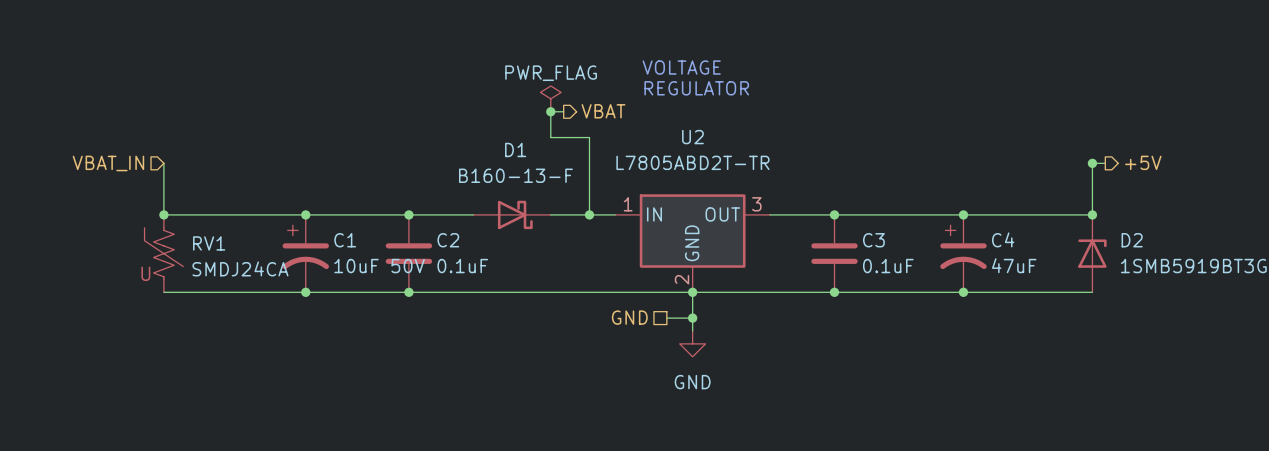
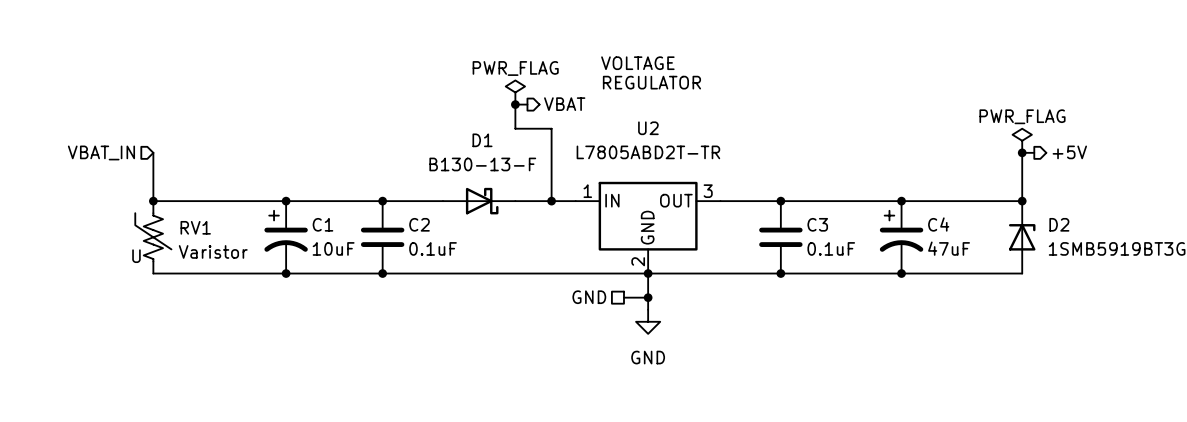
power symbol: none -> PWR_FLAG (1022, 140)
D1 value: B160-13-F (515, 175) -> B130-13-F (482, 164)
C1 value: 10uF 50V (379, 266) -> 10uF (333, 248)
RV1 value: SMDJ24CA (240, 268) -> Varistor (213, 251)

